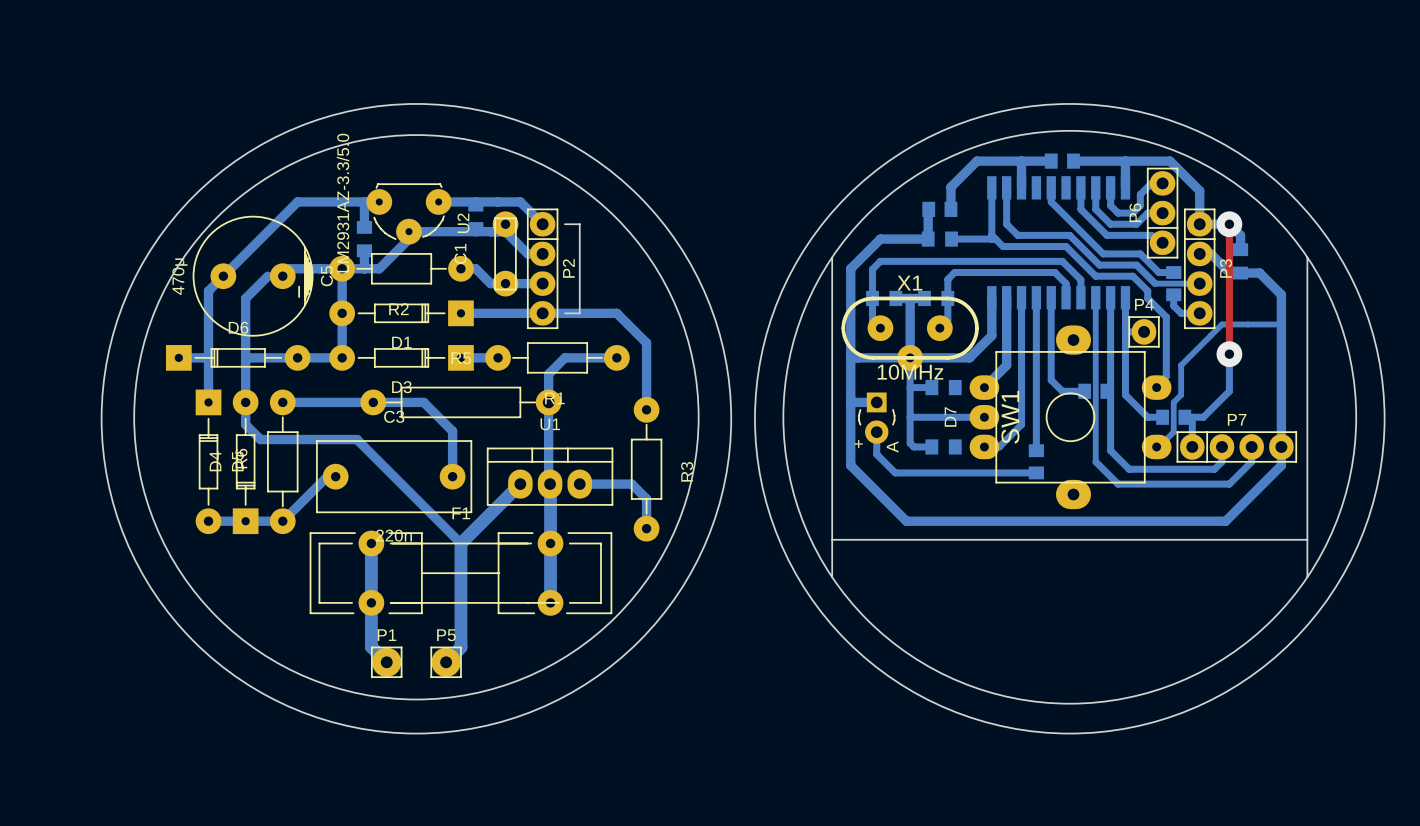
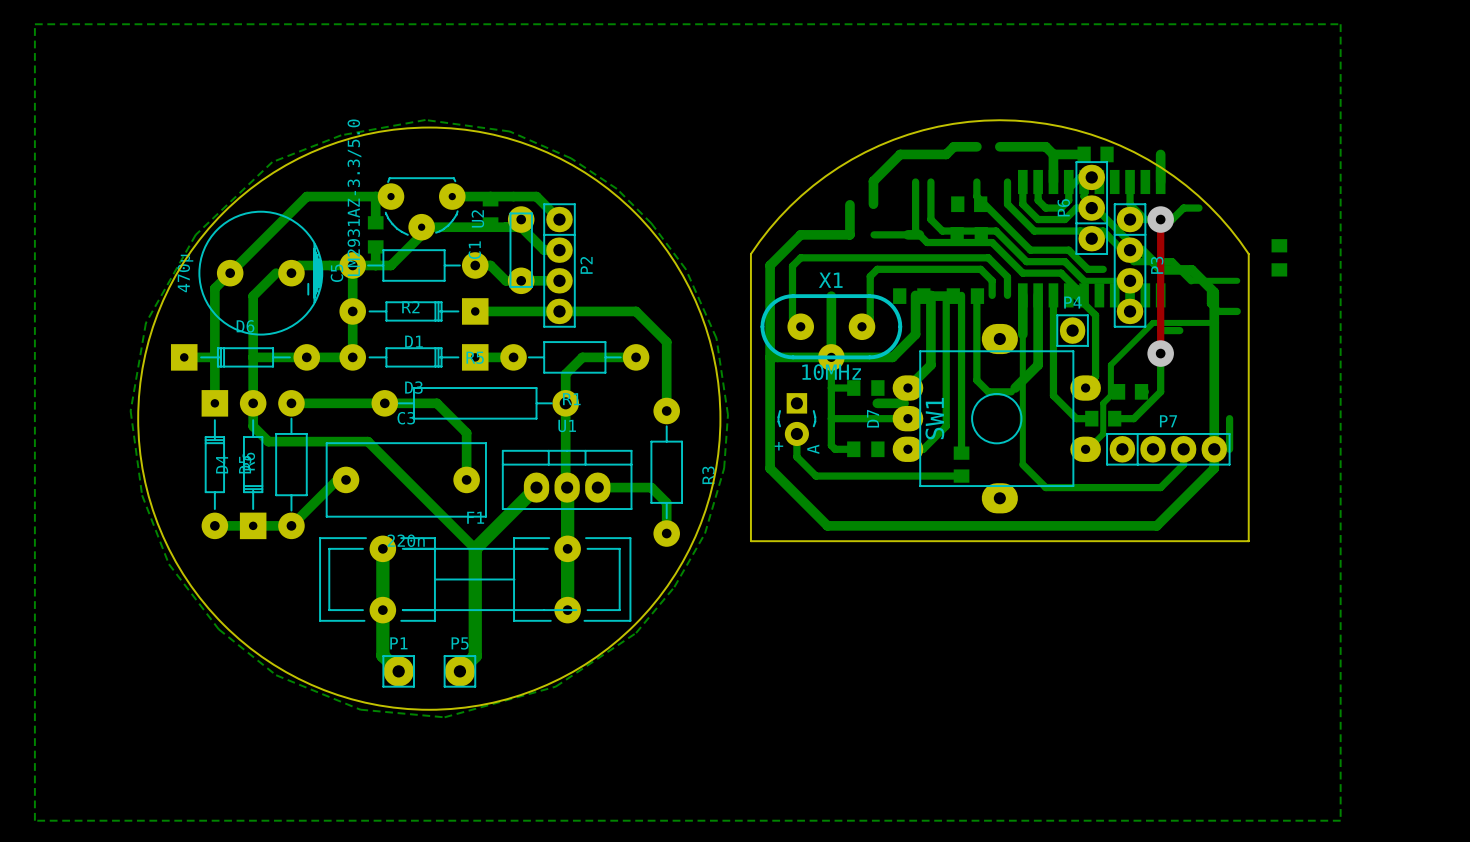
bottom zone outline: none -> (34, 24) (34, 820) (1340, 820) (1340, 24) (34, 24)
round board edge: [100, 103, 733, 735] -> none
round board edge: [754, 103, 1386, 735] -> none
bottom zone outline: none -> (425, 119) (509, 131) (570, 158) (616, 188) (651, 223) (685, 269) (716, 338) (727, 414) (724, 468) (705, 533) (674, 587) (636, 633) (555, 686) (444, 717) (360, 709) (276, 675) (218, 629) (168, 564) (142, 495) (130, 410) (145, 322) (195, 234) (272, 162) (341, 135) (425, 119)
round board edge: [782, 129, 1358, 705] -> none
bottom track: none -> (976, 146) (953, 146) (946, 154) (900, 154) (873, 181) (873, 204)
bottom track: (1021, 161) (976, 161) (950, 187) (950, 209) -> (1053, 154) (1045, 146) (999, 146)
bottom track: (1073, 161) (1170, 161) (1199, 190) (1199, 224) (1229, 224) (1240, 235) (1240, 249) -> none
P6 footprint: [1146, 167, 1179, 259] -> [1075, 161, 1108, 255]
bottom track: (1110, 179) (1110, 205) (1118, 213) (1132, 213) (1140, 205) (1140, 194) (1151, 183) (1162, 183) -> none
bottom track: none -> (1091, 177) (1080, 177) (1068, 188) (1068, 200) (1061, 208) (1045, 208) (1038, 200)
bottom track: none -> (915, 182) (915, 234)
bottom track: none -> (930, 182) (930, 219) (942, 231) (996, 231) (1026, 261) (1064, 261) (1084, 280) (1130, 280)
bottom track: none -> (976, 182) (976, 196) (1030, 250) (1068, 250) (1087, 269) (1103, 269)
bottom track: (1080, 187) (1080, 209) (1106, 235) (1151, 235) (1158, 242) (1162, 242) -> none
bottom track: (1006, 205) (1006, 224) (1017, 235) -> (1007, 182) (1007, 204) (1034, 231) (1049, 231)
P3 footprint: [1183, 208, 1216, 330] -> [1113, 203, 1147, 328]
bottom track: (928, 209) (928, 239) (891, 239) -> none
bottom track: (991, 209) (991, 239) -> (1022, 204) (1038, 219) (1064, 219) (1076, 208) (1091, 208)
board edge: (564, 224) (579, 224) (579, 313) (564, 313) -> none
via: none -> (1160, 219)
top track: (1229, 224) (1229, 354) -> (1160, 219) (1160, 353)
via: (1229, 224) -> none
bottom track: (991, 235) (1002, 246) (1066, 246) (1095, 276) (1132, 276) (1147, 291) (1147, 298) (1166, 317) (1166, 376) (1156, 387) -> (915, 231) (927, 242) (992, 242) (1022, 273) (1061, 273) (1076, 288) (1076, 296) (1095, 315) (1095, 376) (1085, 388)
bottom track: none -> (874, 234) (907, 234)
bottom track: (880, 239) (850, 268) (850, 465) (906, 521) -> (850, 204) (849, 234) (800, 234) (770, 265) (770, 468) (827, 525) (934, 525)
bottom track: (951, 239) (995, 239) -> none
bottom track: (1106, 253) (1140, 253) (1158, 272) (1173, 272) -> none
bottom track: (1199, 253) (1210, 253) (1229, 273) (1259, 273) (1281, 294) (1281, 465) (1225, 521) (1121, 521) -> (1141, 250) (1161, 269) (1191, 269) (1214, 292) (1214, 468) (1156, 525)
board edge: (832, 257) (832, 576) -> none
board edge: none -> (1248, 253) (1230, 228) (1209, 206) (1173, 176) (1147, 159) (1120, 145) (1076, 130) (1030, 121) (999, 120) (968, 121) (938, 126) (908, 134) (879, 145) (851, 159) (825, 176) (801, 195) (779, 217) (750, 254) (750, 541) (1248, 541) (1248, 254)
board edge: (1307, 257) (1307, 576) -> none
bottom track: (880, 261) (872, 269) (872, 320) (880, 328) -> (907, 257) (800, 257) (792, 266) (792, 318) (800, 326)
bottom track: (958, 261) (1062, 261) (1080, 279) (1080, 297) -> (988, 257) (1007, 276) (1007, 295)
part: (1173, 283) -> none
bottom track: none -> (930, 295) (930, 365) (907, 388)
bottom track: none -> (946, 295) (946, 426) (923, 449) (907, 449)
bottom track: (1036, 297) (1036, 450) -> (961, 295) (961, 453)
bottom track: (1051, 297) (1051, 380) (1062, 391) (1084, 391) -> (976, 295) (976, 380) (988, 391) (1011, 391)
bottom track: (1066, 297) (1066, 283) (1054, 272) (954, 272) (947, 279) (947, 320) (939, 328) -> (992, 295) (992, 280) (980, 269) (877, 269) (870, 276) (870, 318) (861, 326)
bottom track: (1095, 297) (1095, 461) (1118, 484) -> (1022, 334) (1022, 464) (1045, 487) (1153, 487)
bottom track: (1110, 297) (1110, 450) (1129, 469) (1214, 469) (1221, 461) (1221, 446) -> none
bottom track: (1125, 297) (1125, 354) -> none
bottom track: (910, 298) (910, 443) (913, 446) (931, 446) -> (831, 296) (831, 445) (835, 449) (853, 449)
bottom track: (1281, 324) (1221, 324) (1181, 365) (1181, 395) (1173, 402) (1173, 432) (1156, 446) -> (1214, 322) (1153, 322) (1110, 365) (1110, 395) (1103, 403) (1103, 433) (1087, 449) (1085, 449)
P4 position: (1144, 331) -> (1072, 330)
X1 position: (910, 333) -> (831, 332)
bottom track: (991, 335) (969, 357) (865, 357) -> (915, 295) (915, 334) (892, 357)
via: none -> (1160, 353)
bottom track: (1229, 354) (1229, 391) (1203, 417) (1184, 417) -> none
via: (1229, 354) -> none
part: none -> (865, 388)
bottom track: (910, 387) (931, 387) -> (831, 388) (853, 388)
part: (943, 387) -> none
bottom track: (1125, 391) (1125, 395) (1147, 417) (1162, 417) -> (1160, 391) (1133, 418) (1114, 418)
bottom track: (1021, 395) (1021, 424) (999, 446) (984, 446) -> (1053, 395) (1076, 418) (1091, 418)
bottom track: (910, 417) (984, 417) -> (831, 418) (907, 418)
part: none -> (1103, 418)
SW1 position: (1070, 417) -> (996, 418)
part: (1173, 417) -> none
D7 position: (876, 418) -> (796, 419)
bottom track: (876, 432) (876, 454) (895, 472) -> (796, 433) (796, 456) (816, 476) (923, 476)
part: none -> (865, 449)
part: (943, 446) -> none
P7 position: (1236, 446) -> (1168, 449)
bottom track: (1251, 446) (1251, 461) (1229, 484) (1125, 484) -> (1183, 449) (1183, 464) (1160, 487)
part: none -> (961, 464)
part: (1036, 461) -> none
bottom track: (932, 472) (1036, 472) -> (770, 357) (877, 357)
board edge: (832, 539) (1307, 539) -> none

